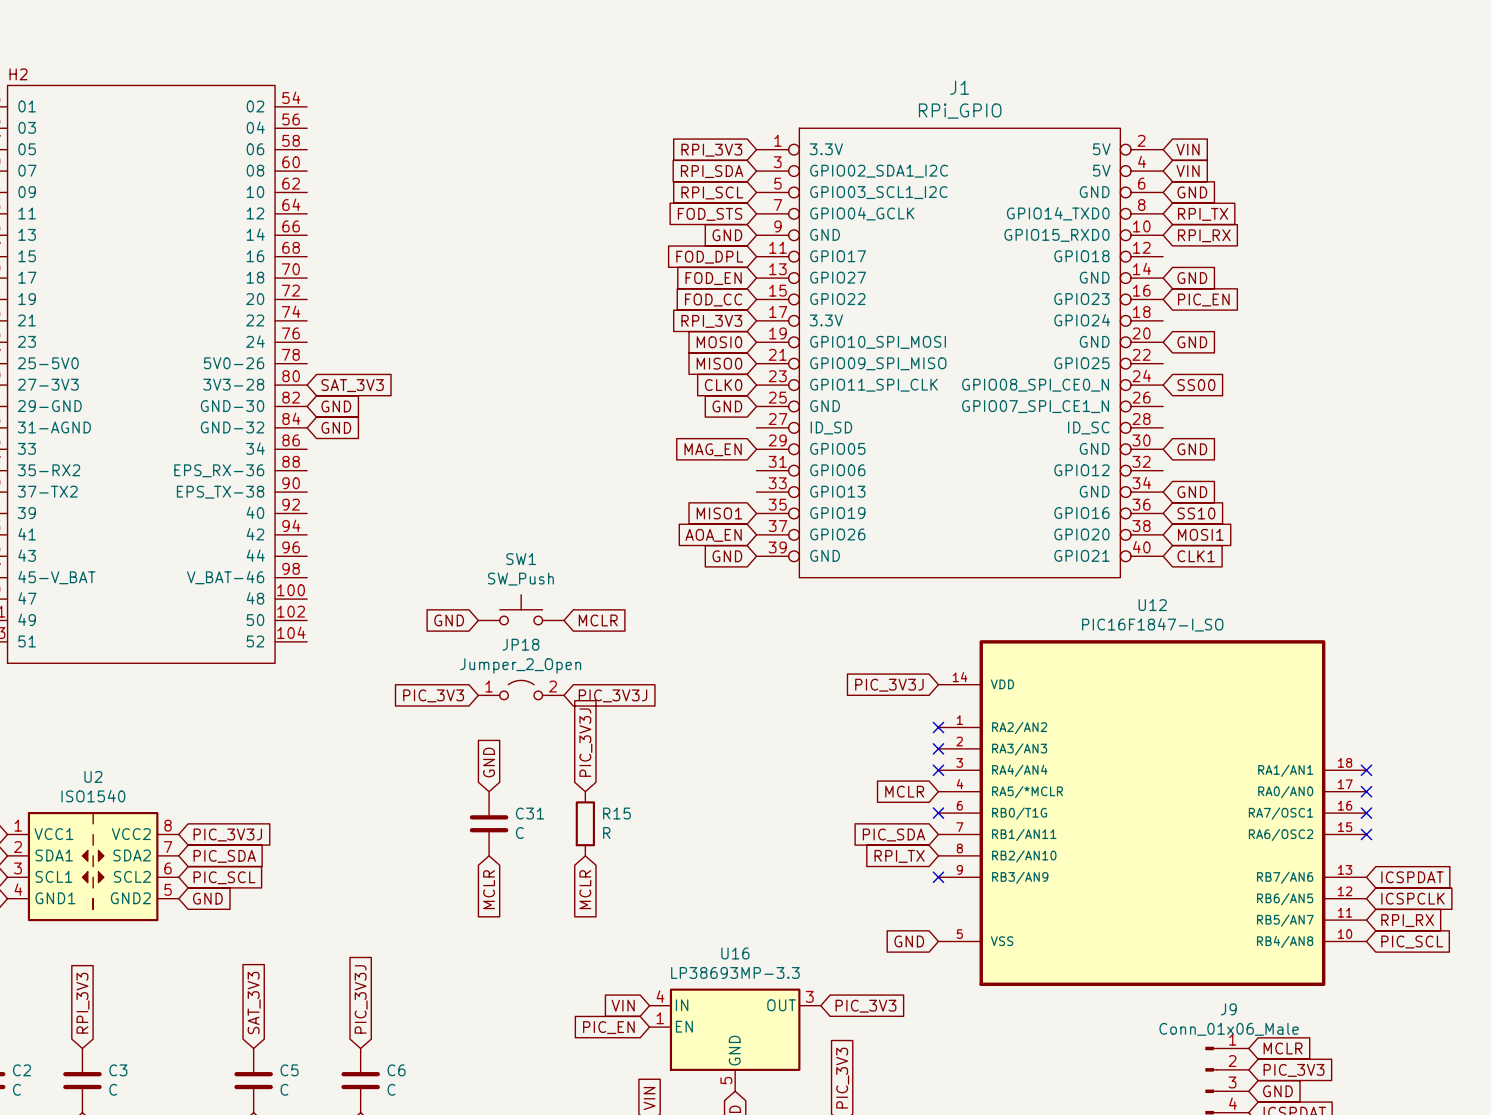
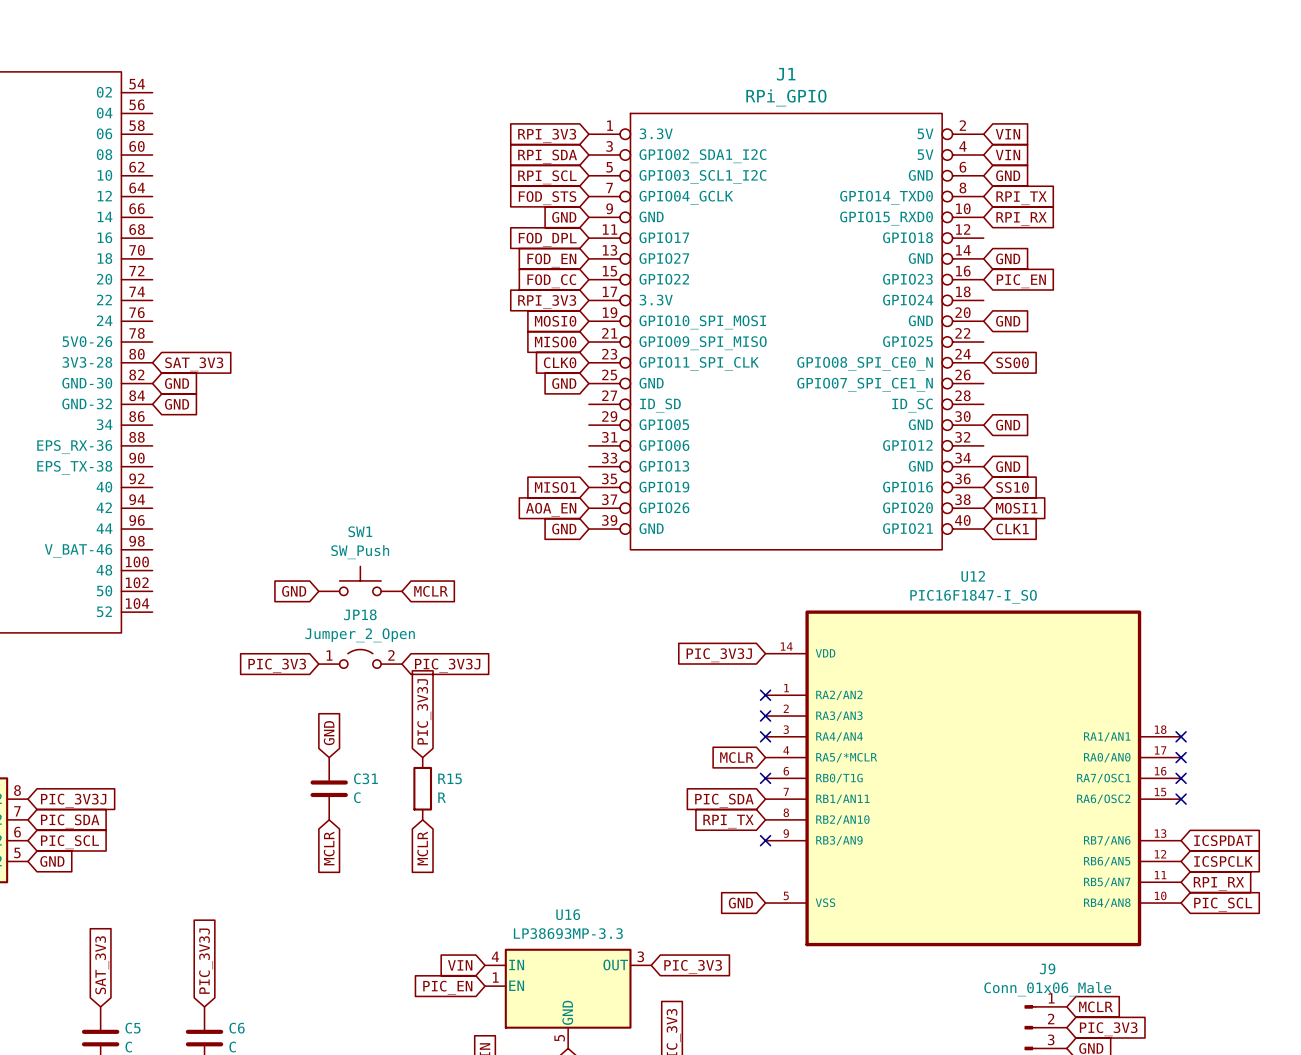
global label: MAG_EN (713, 449) -> none

